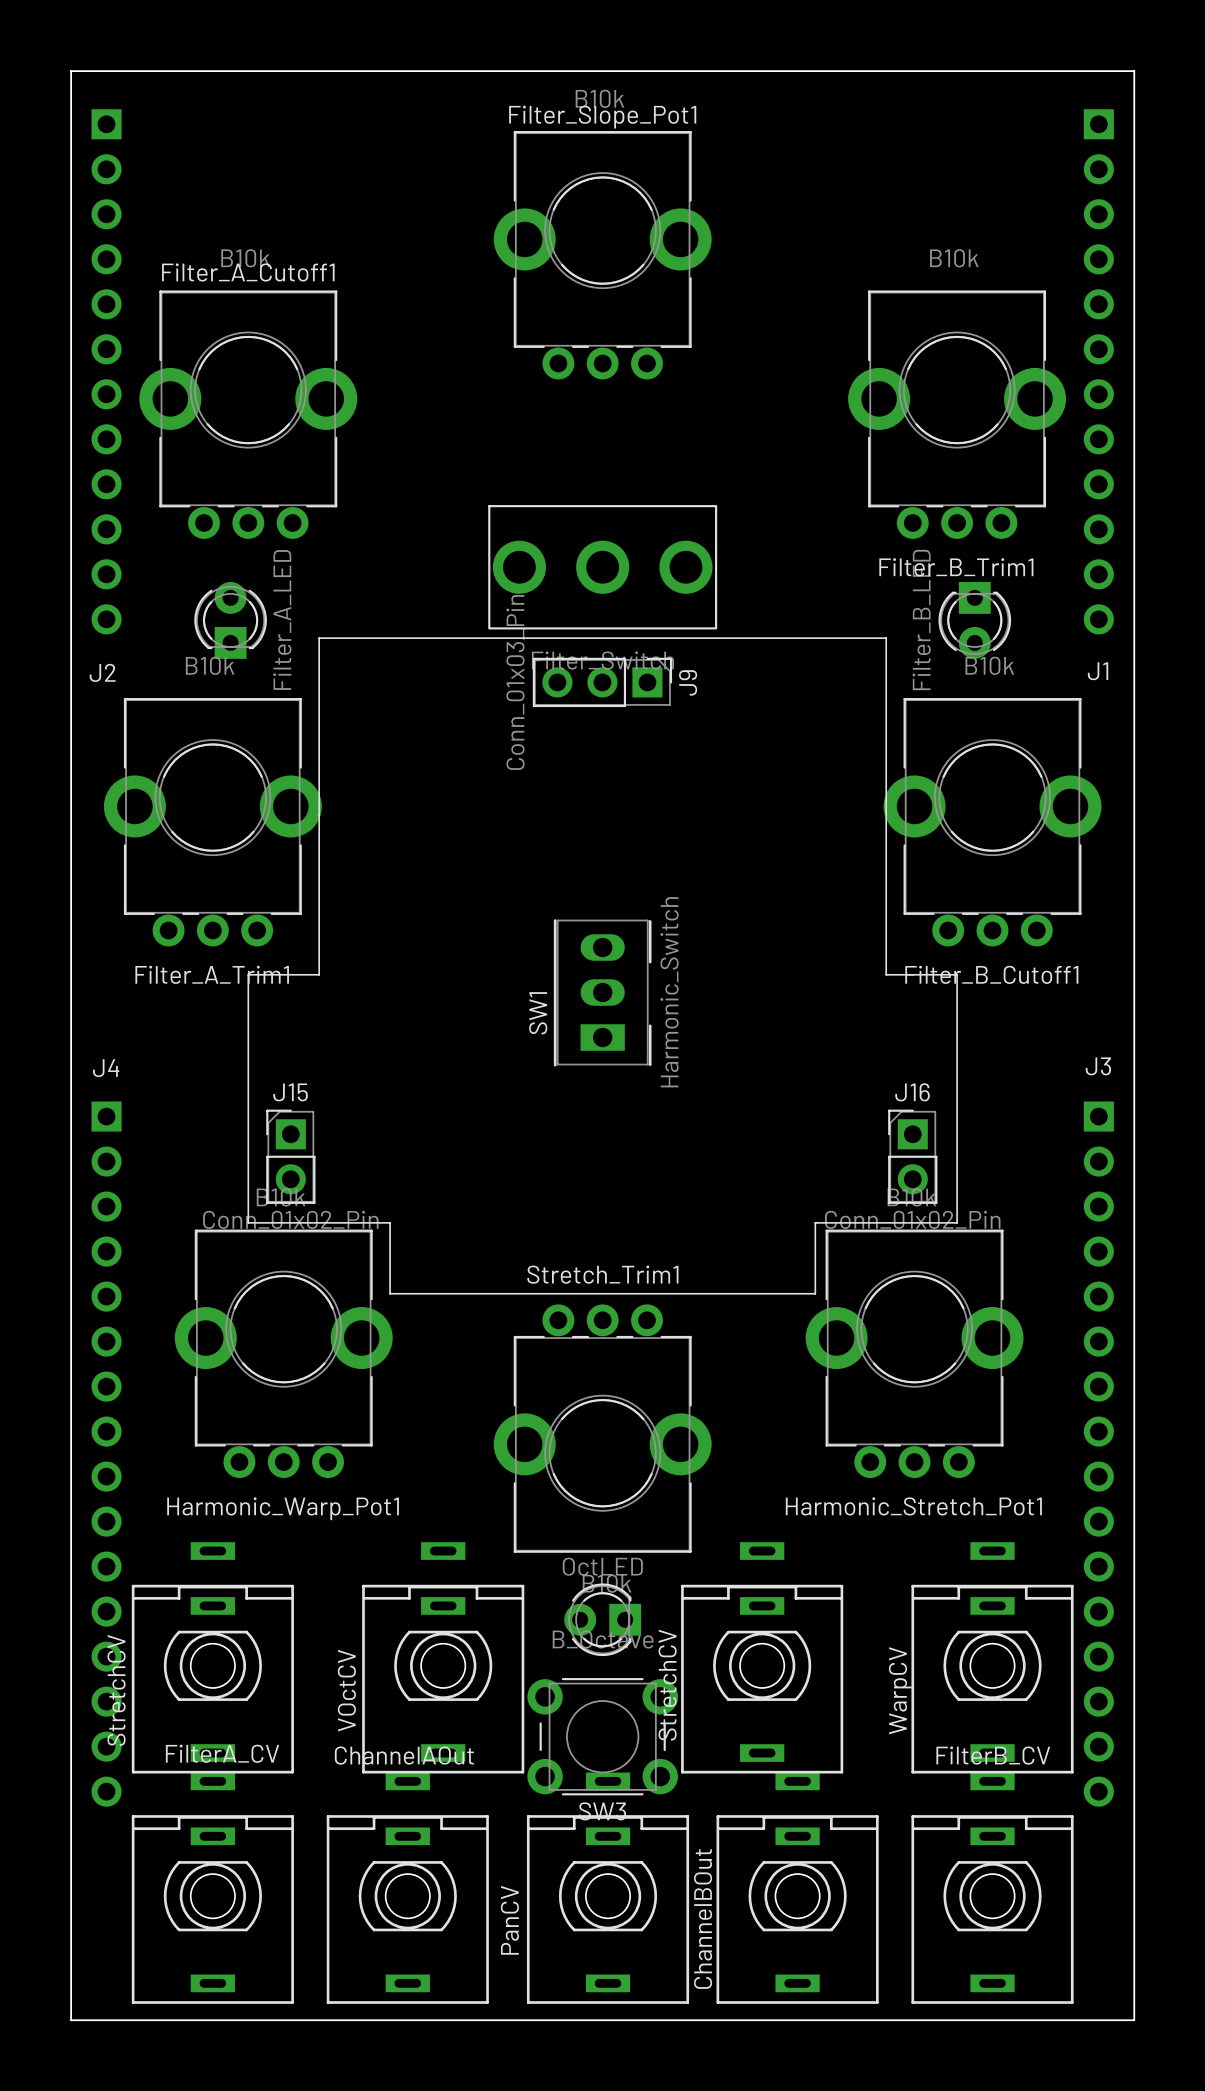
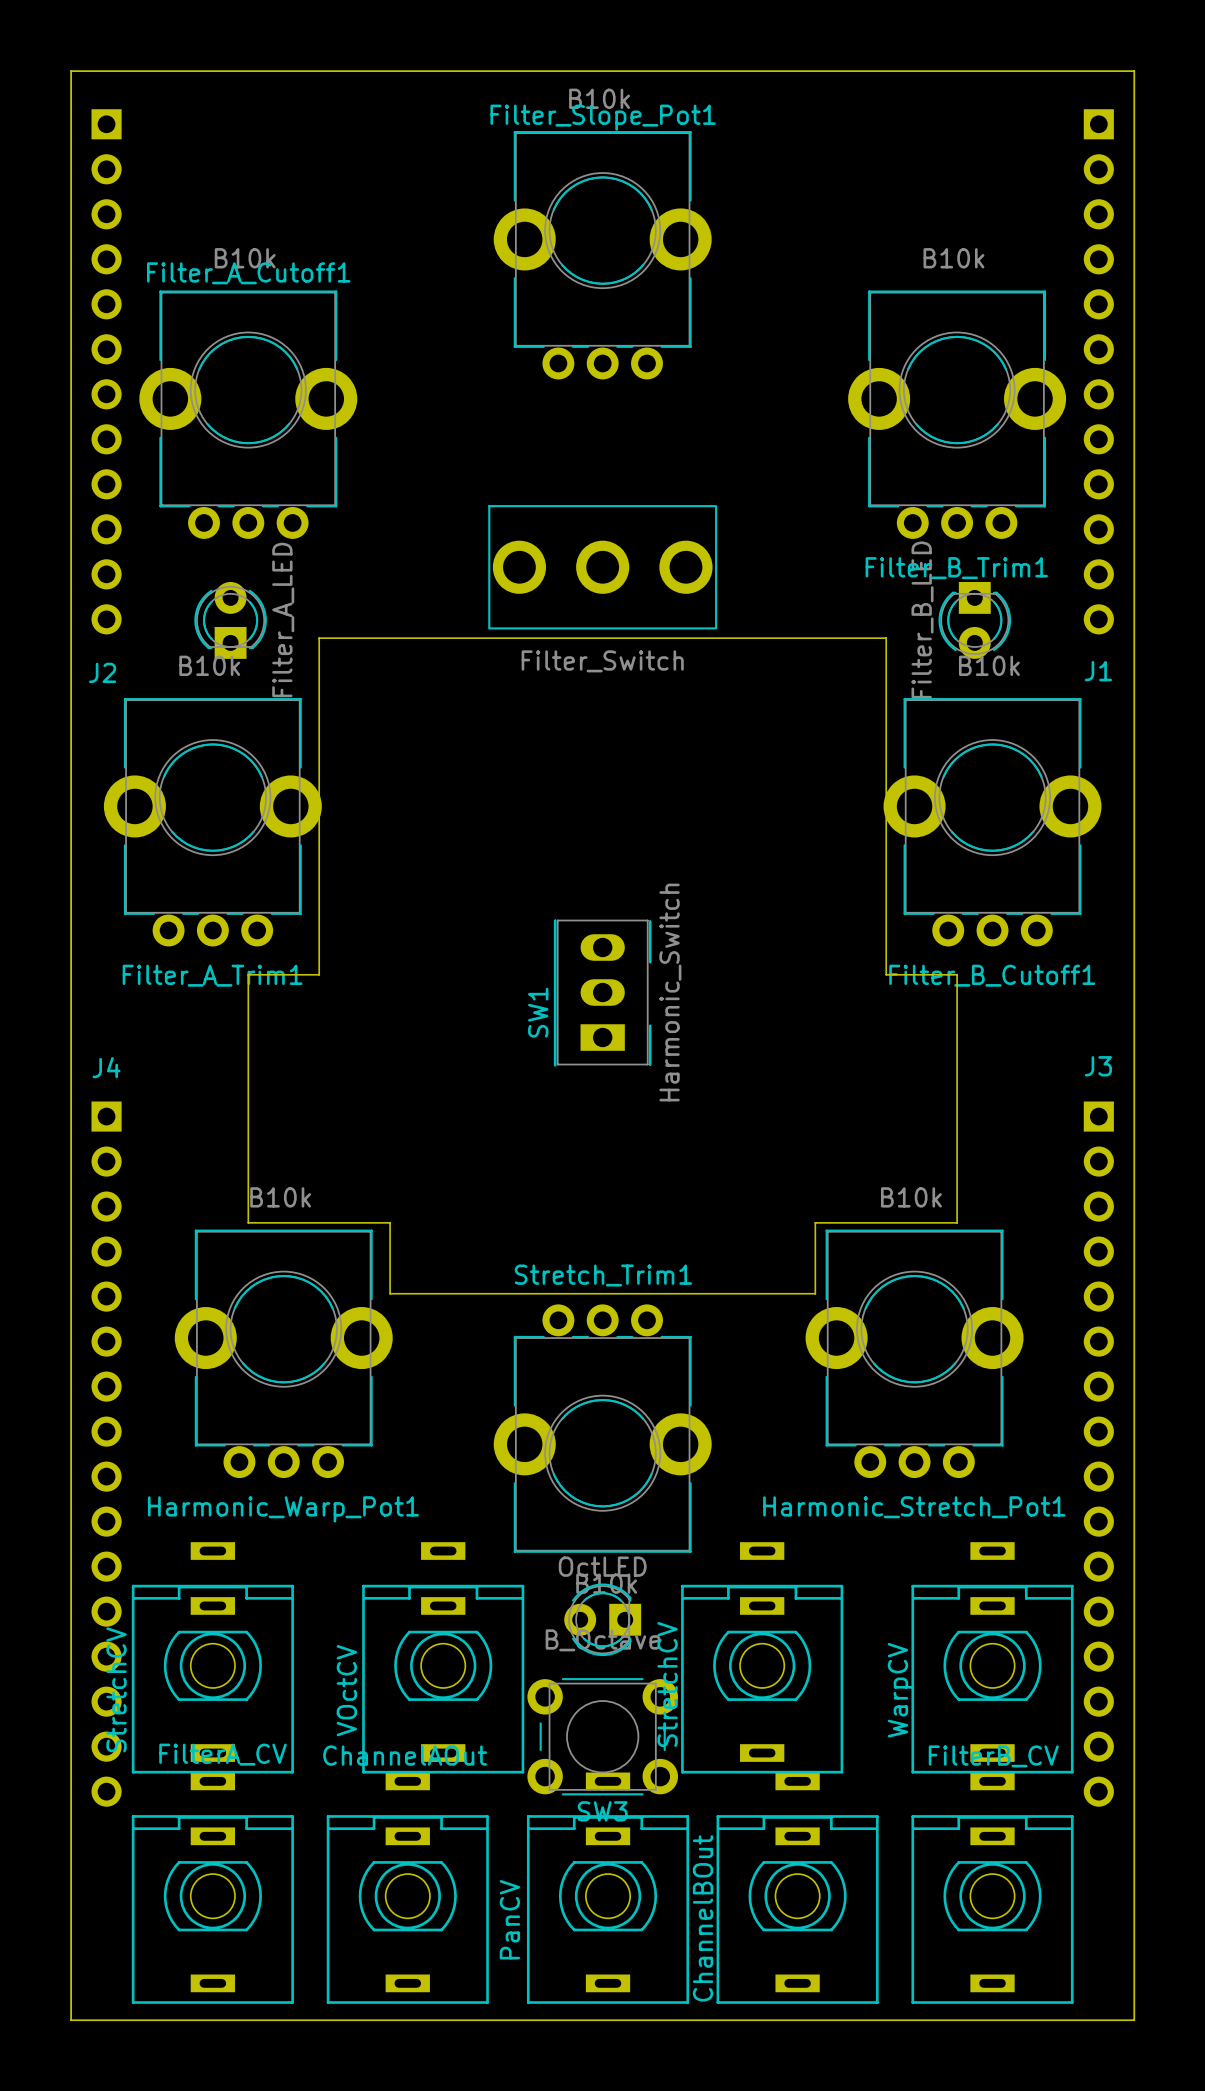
line: (319, 638) (319, 974) (248, 974) (248, 1222) (390, 1222) (390, 1293) (815, 1293) (815, 1222) (957, 1222) (957, 974) (886, 974) (886, 638) (319, 638) -> none
board edge: none -> (319, 638) (319, 974) (248, 974) (248, 1222) (390, 1222) (390, 1293) (815, 1293) (815, 1222) (957, 1222) (957, 974) (886, 974) (886, 638) (319, 638)
J9: Conn_01x03_Pin (602, 682) -> none
J15: Conn_01x02_Pin (290, 1156) -> none
J16: Conn_01x02_Pin (912, 1156) -> none

